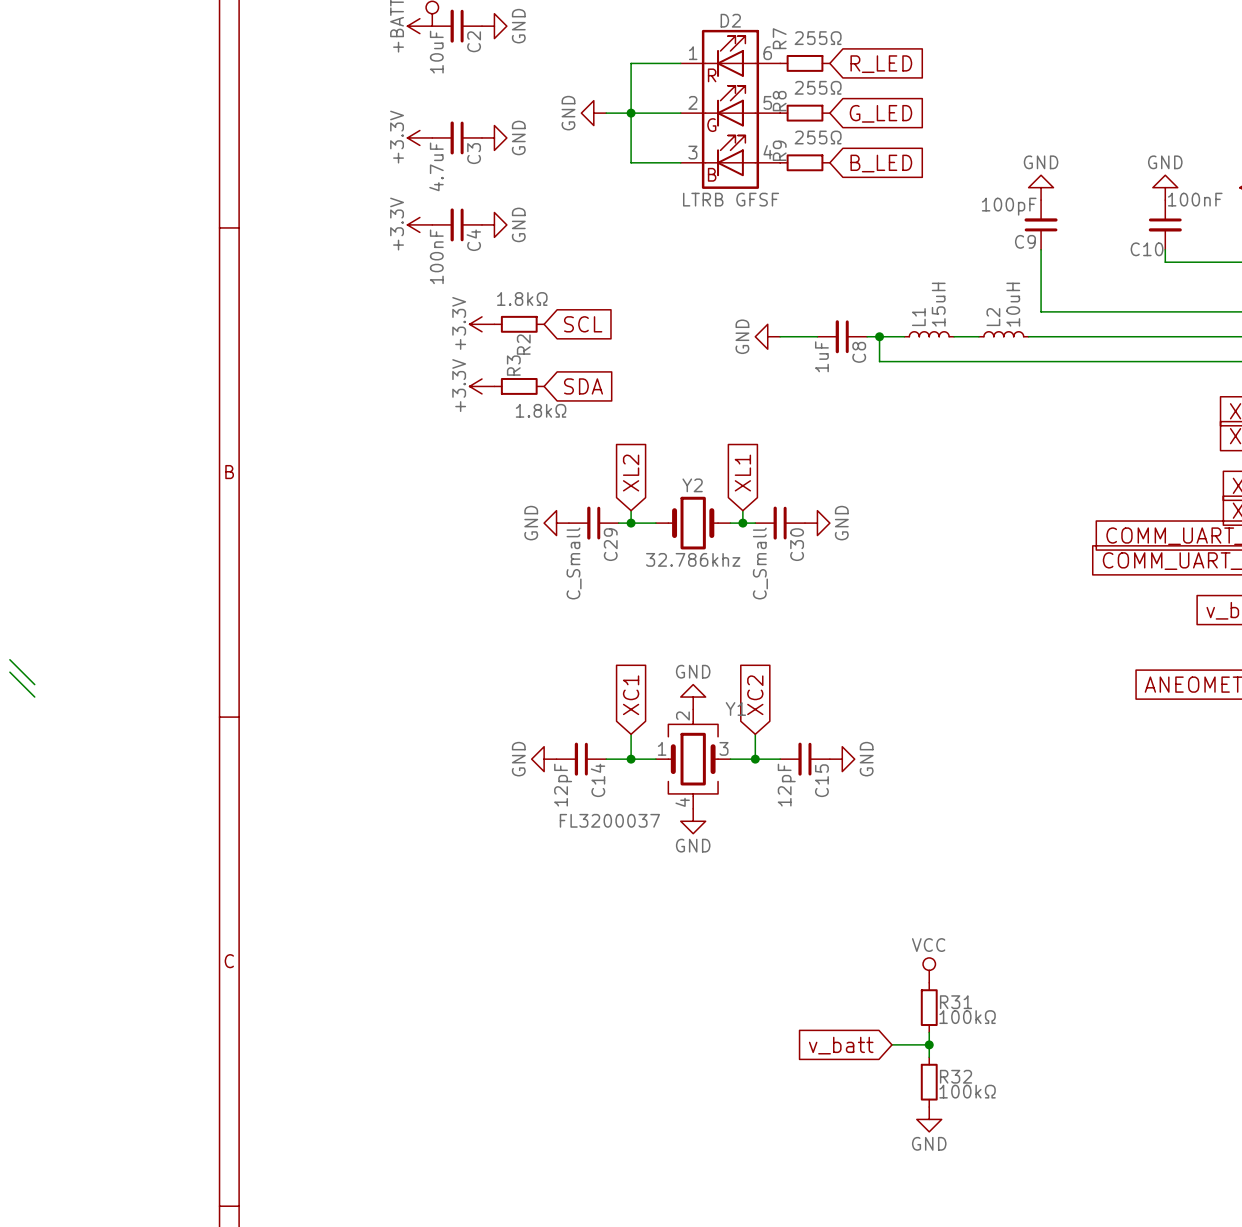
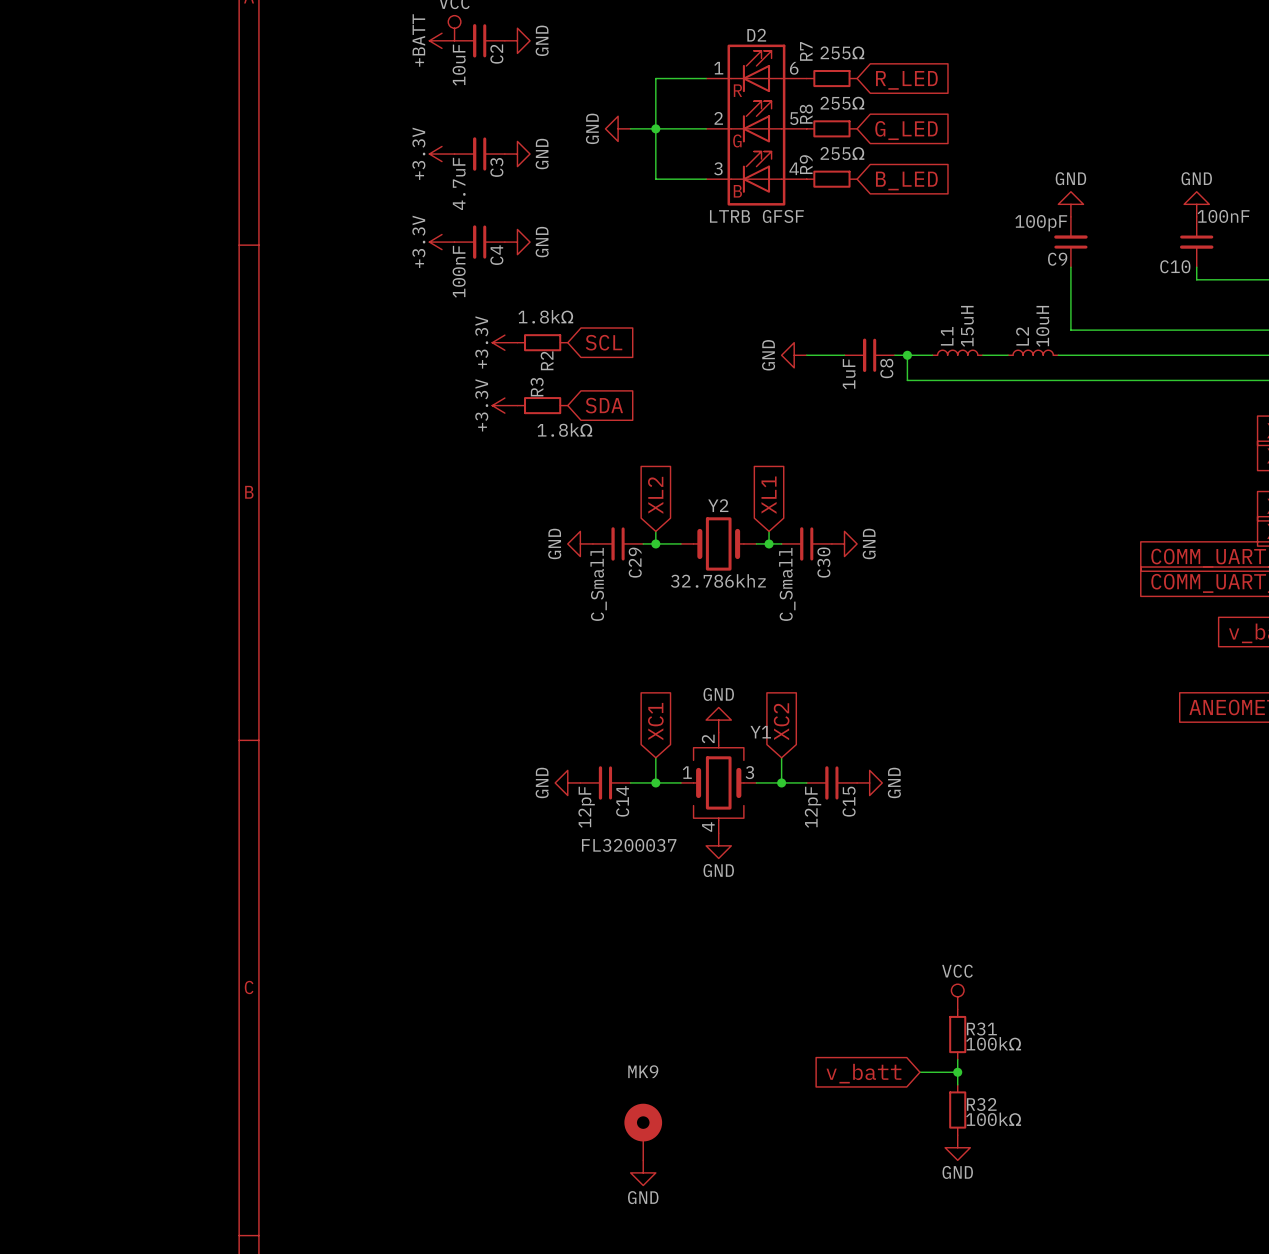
wire: (9, 659) (34, 684) -> none
wire: (9, 672) (34, 697) -> none
MK9: none -> (643, 1132)
power symbol: none -> GND (643, 1172)

